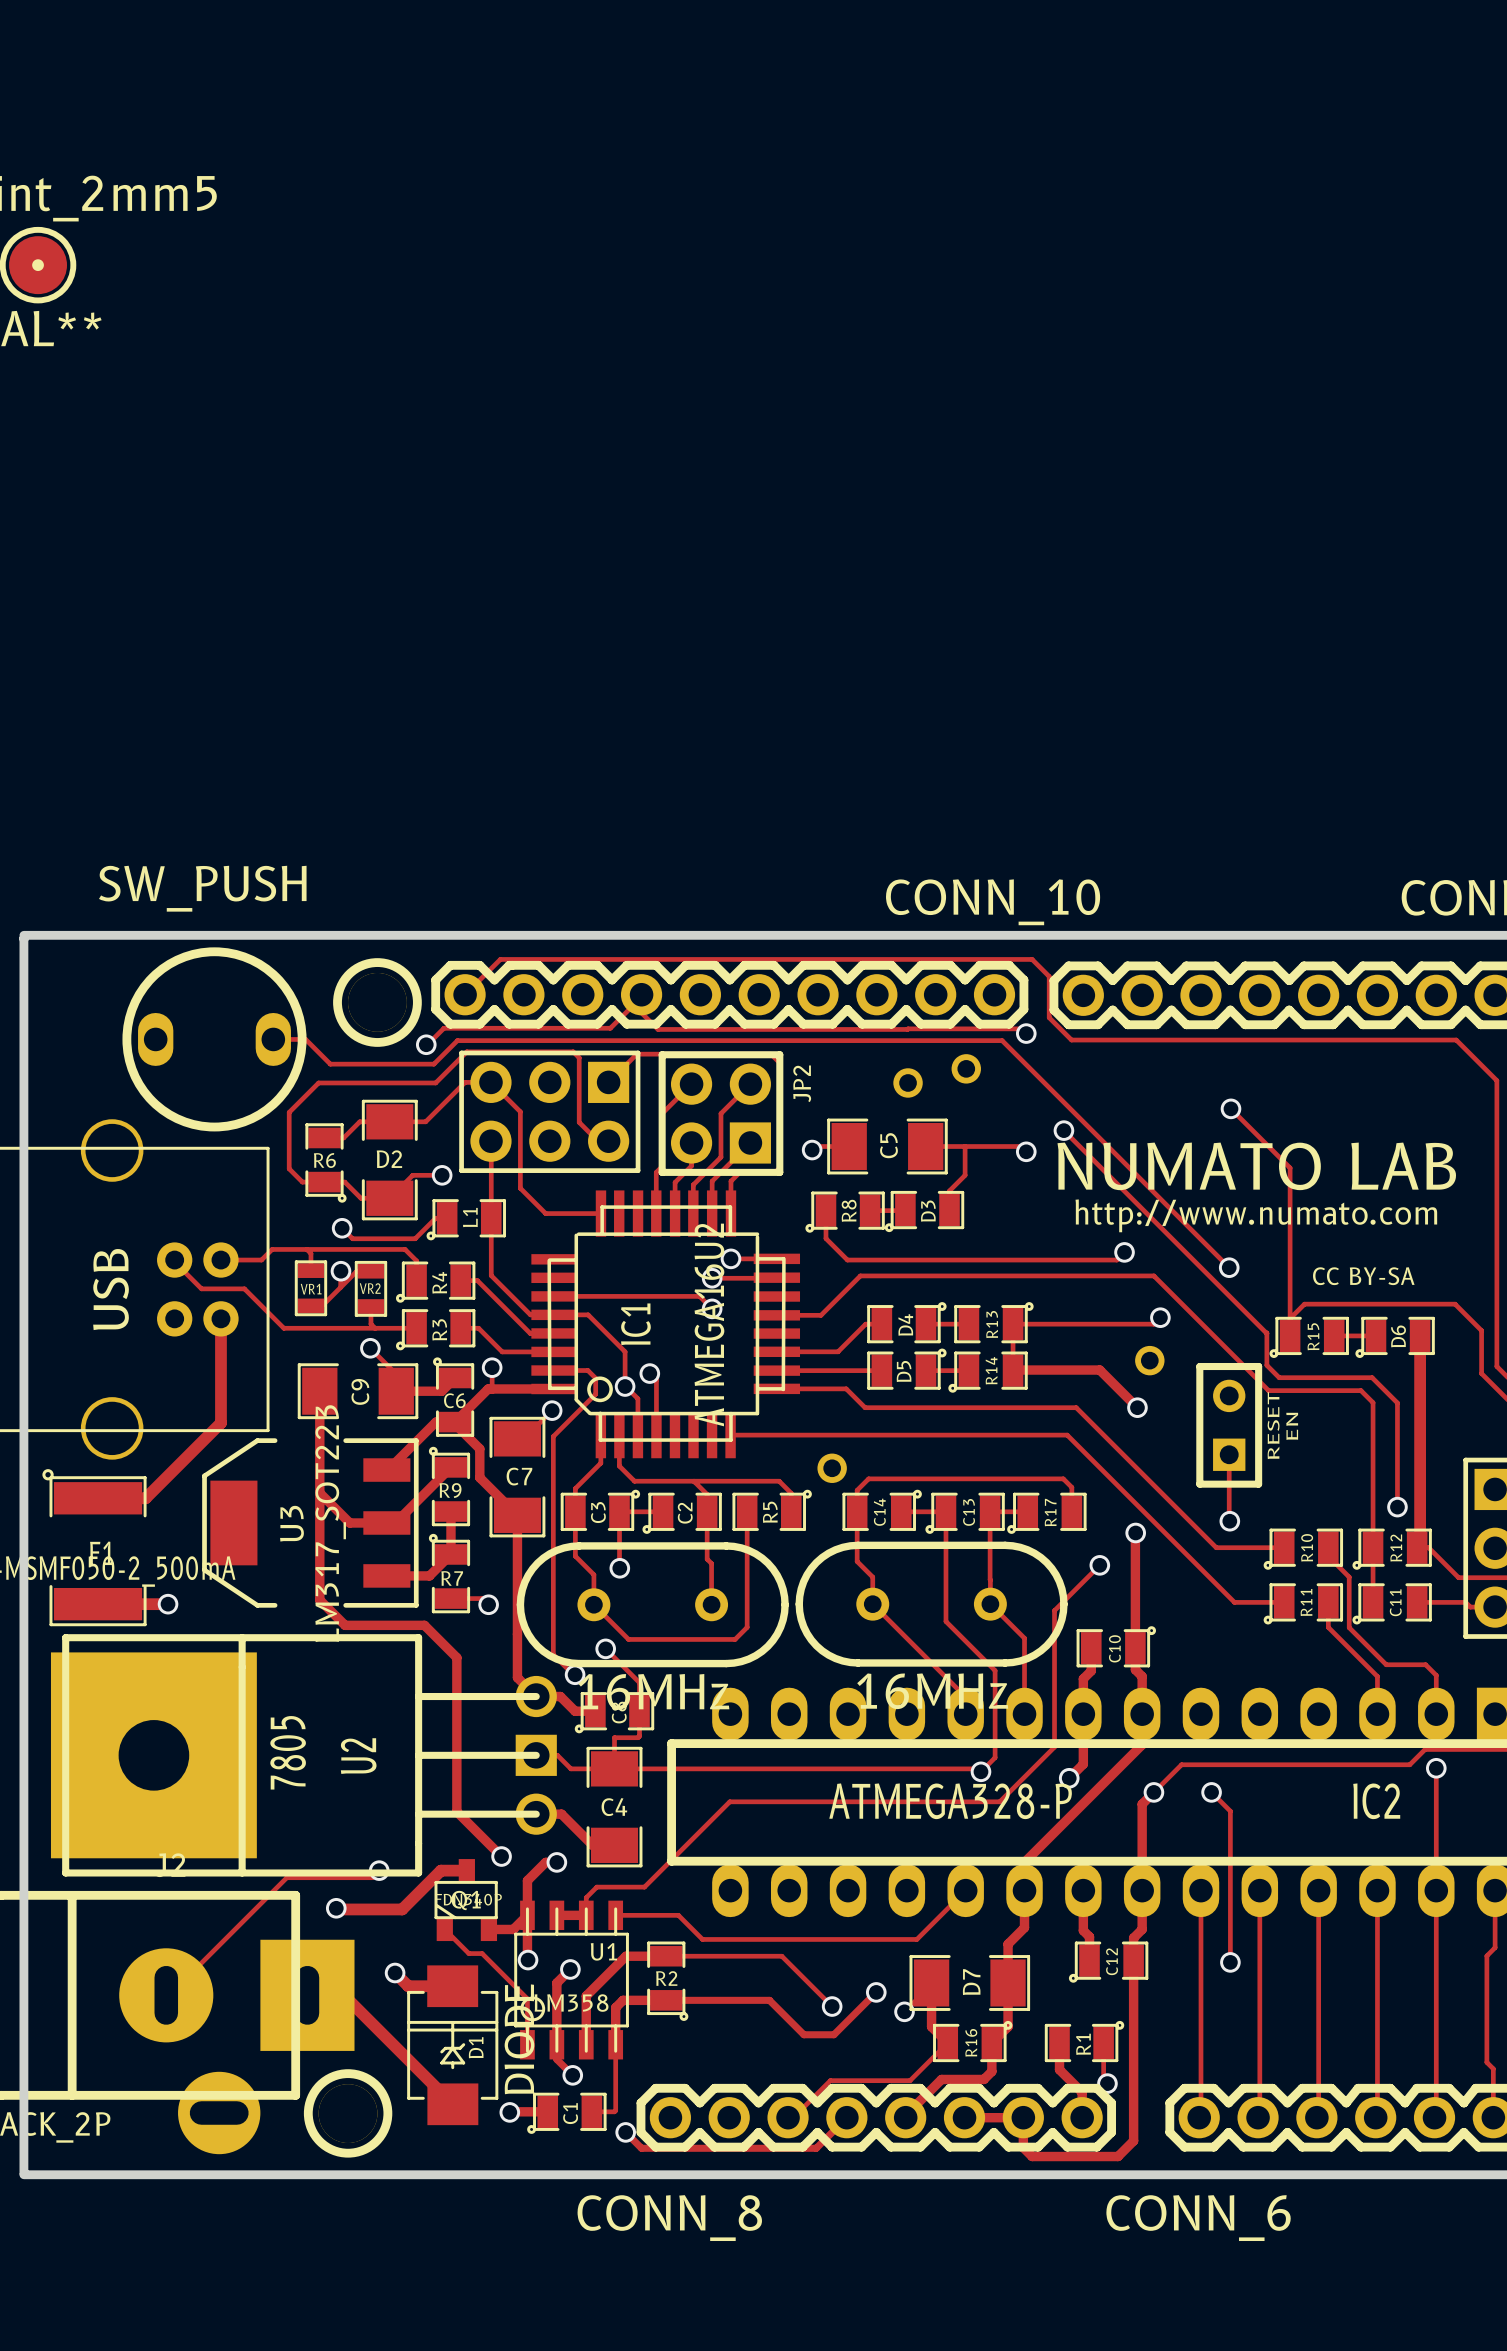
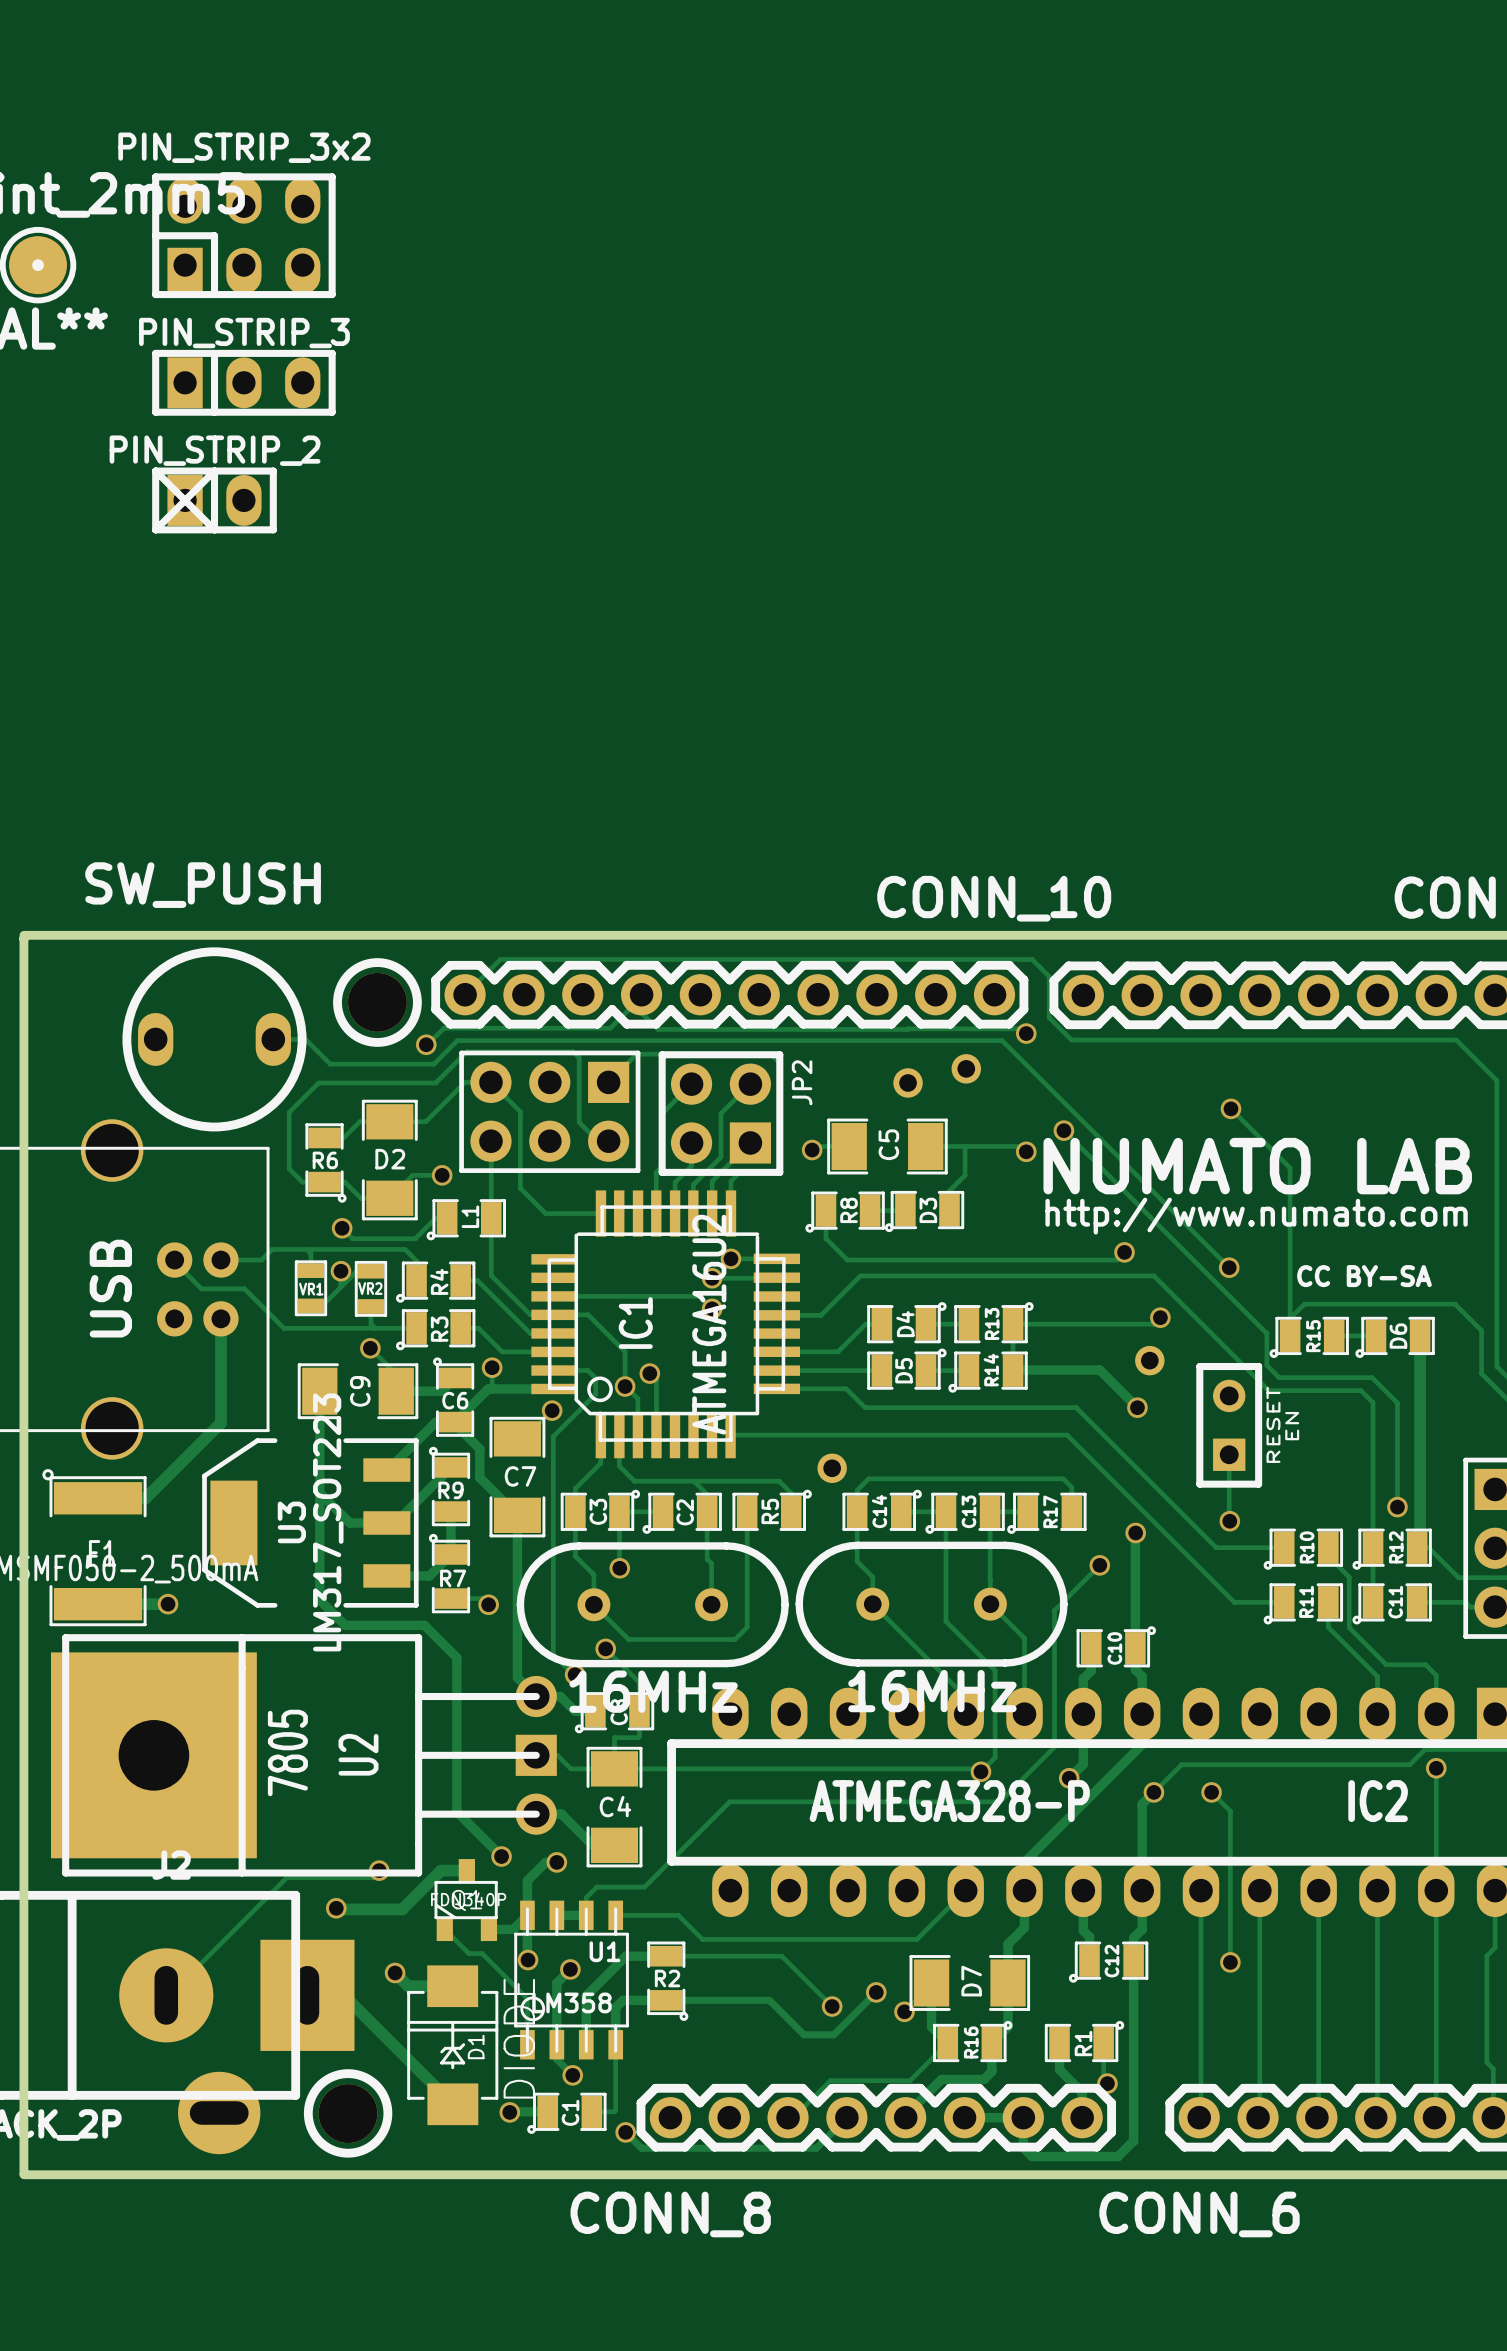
PIN_STRIP_3x2: none -> (243, 235)
PIN_STRIP_3: none -> (243, 382)
PIN_STRIP_2: none -> (214, 500)

